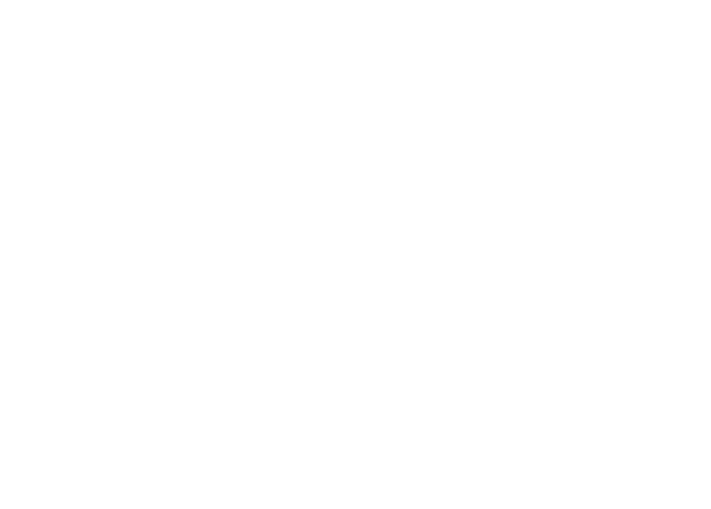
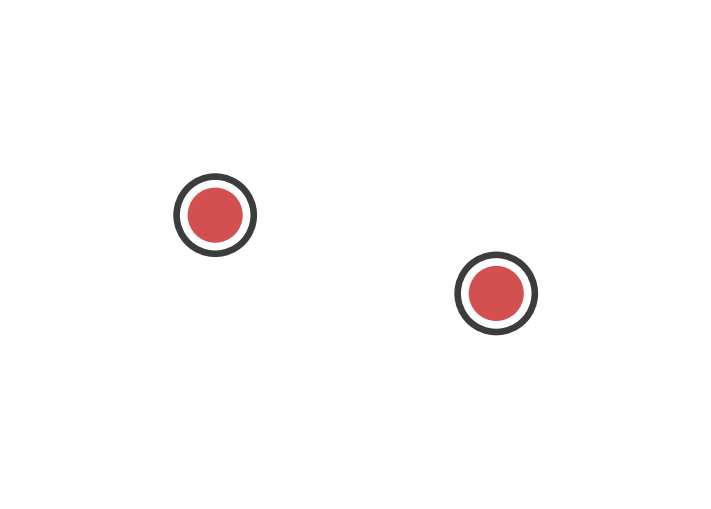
part: none -> (215, 215)
part: none -> (496, 293)

